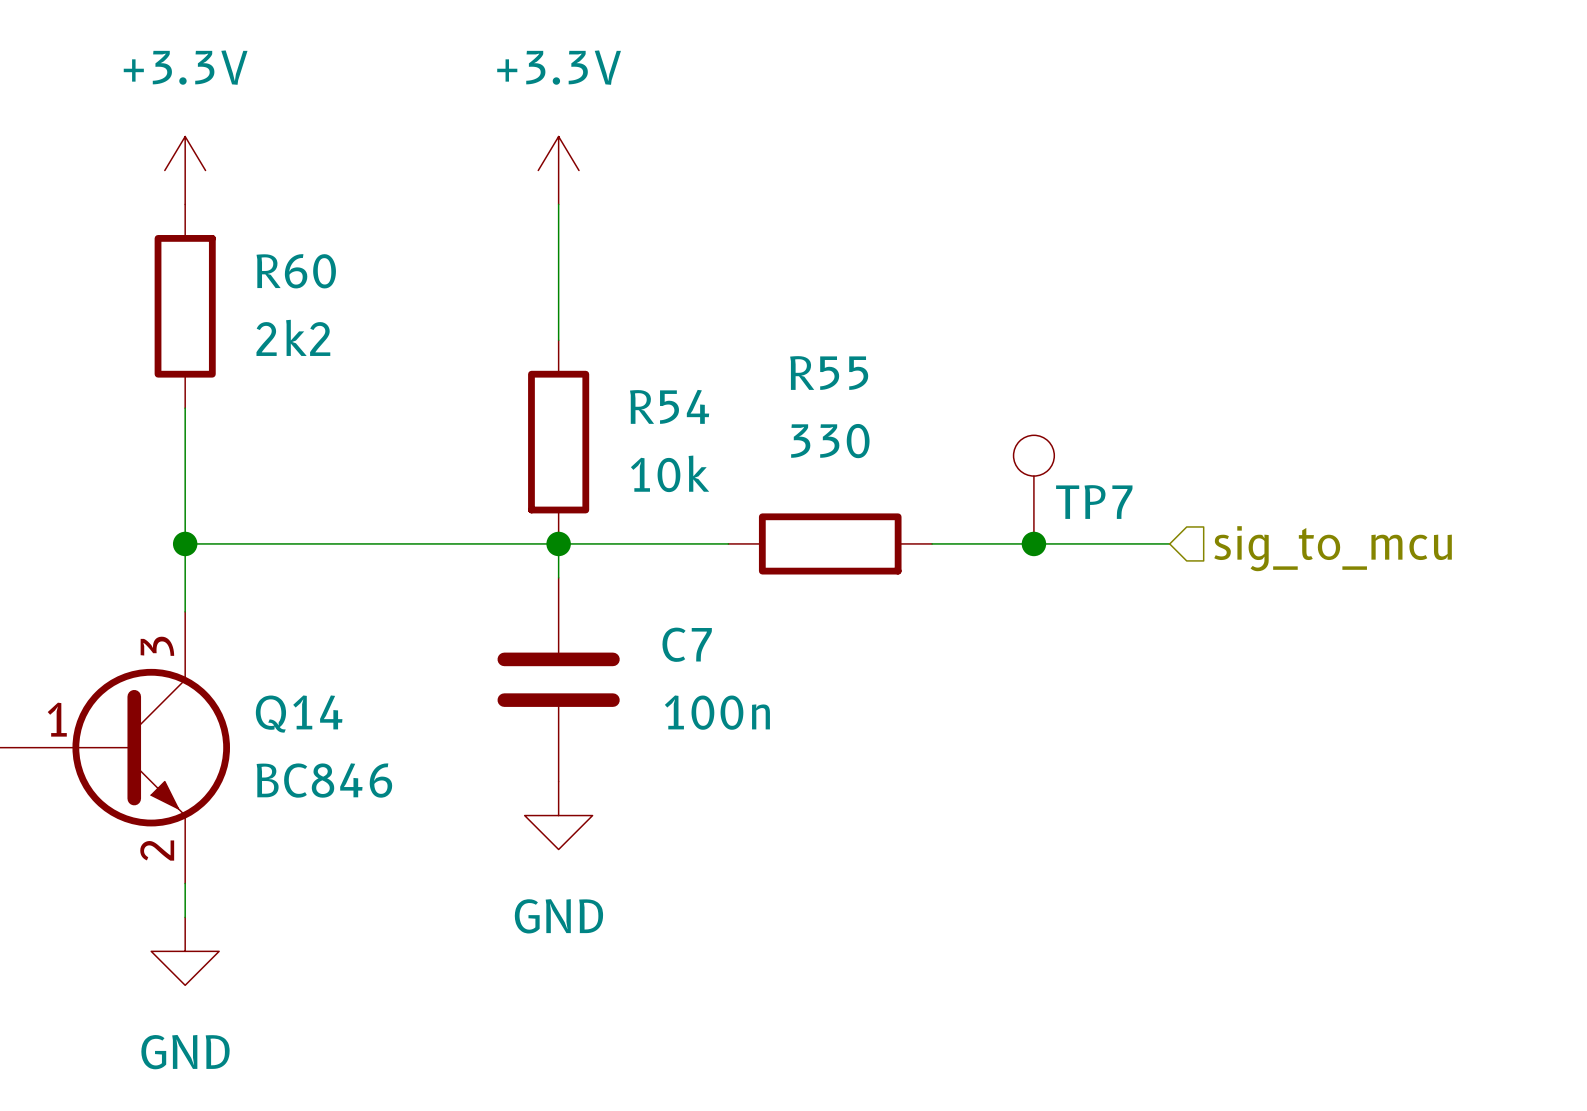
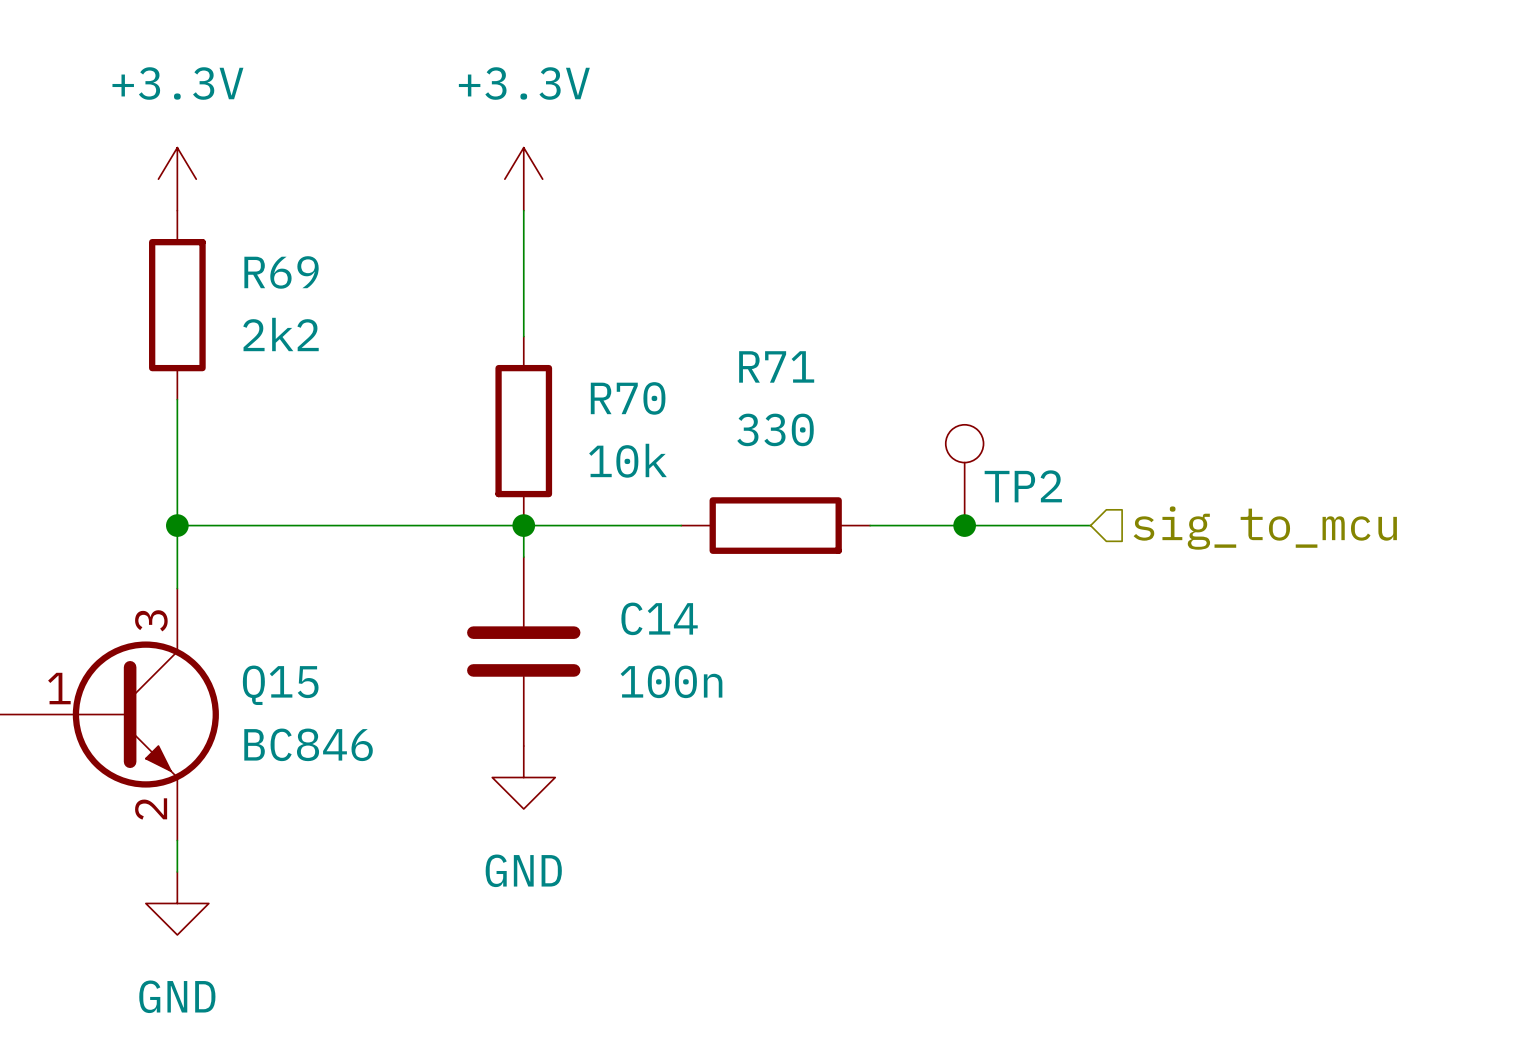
R60 name: R60 (296, 271) -> R69 (281, 272)
R55 name: R55 (829, 373) -> R71 (776, 366)
R54 name: R54 (669, 406) -> R70 (628, 398)
TP7 name: TP7 (1094, 502) -> TP2 (1023, 486)
C7 name: C7 (687, 644) -> C14 (659, 618)
Q14 name: Q14 (299, 714) -> Q15 (280, 685)

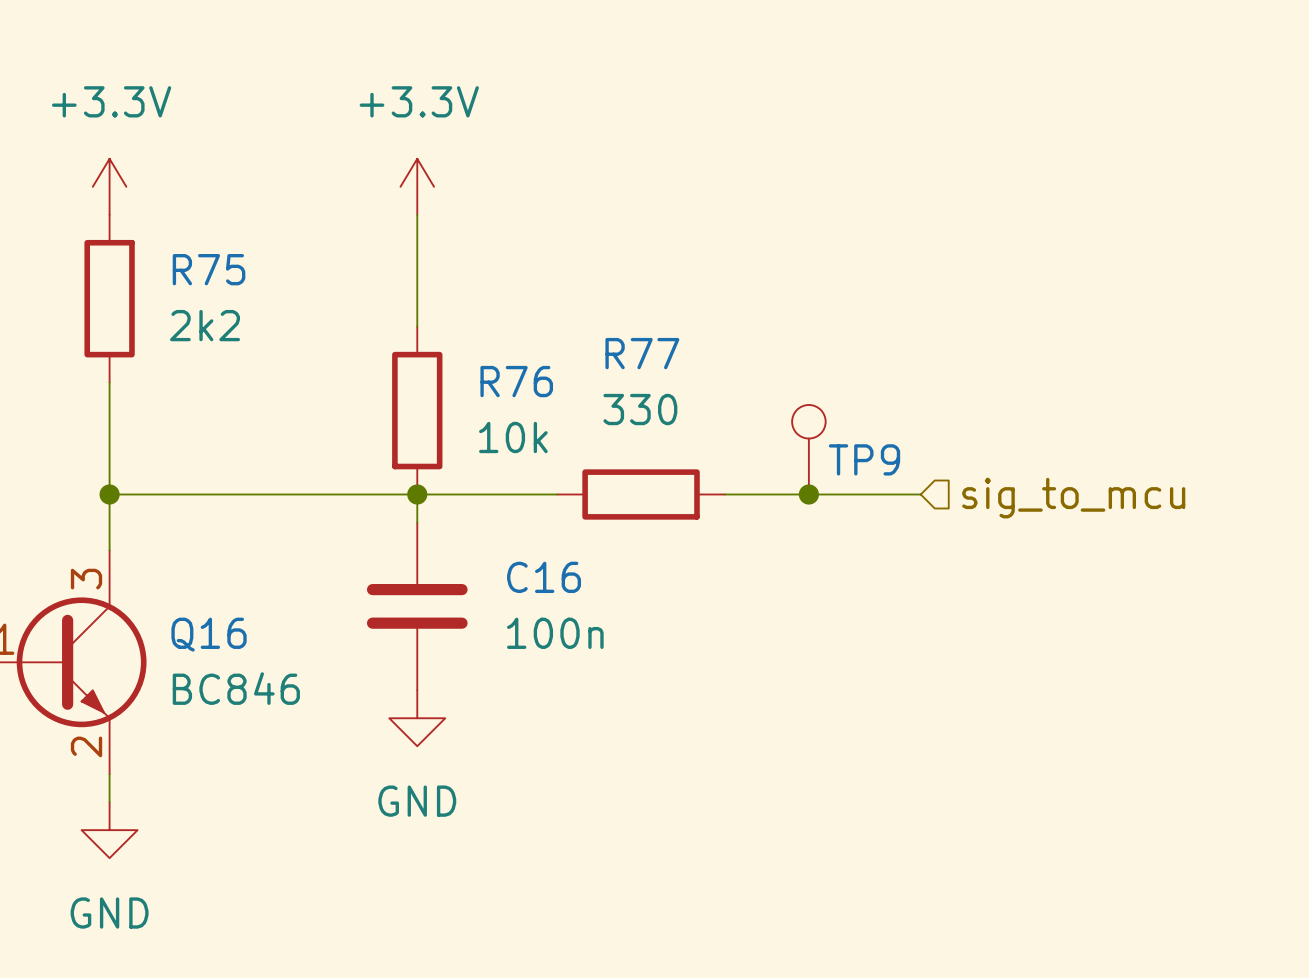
R69 name: R69 (281, 272) -> R75 (209, 269)
R71 name: R71 (776, 366) -> R77 (642, 353)
R70 name: R70 (628, 398) -> R76 (516, 381)
TP2 name: TP2 (1023, 486) -> TP9 (864, 459)
C14 name: C14 (659, 618) -> C16 (544, 577)
Q15 name: Q15 (280, 685) -> Q16 (209, 634)

